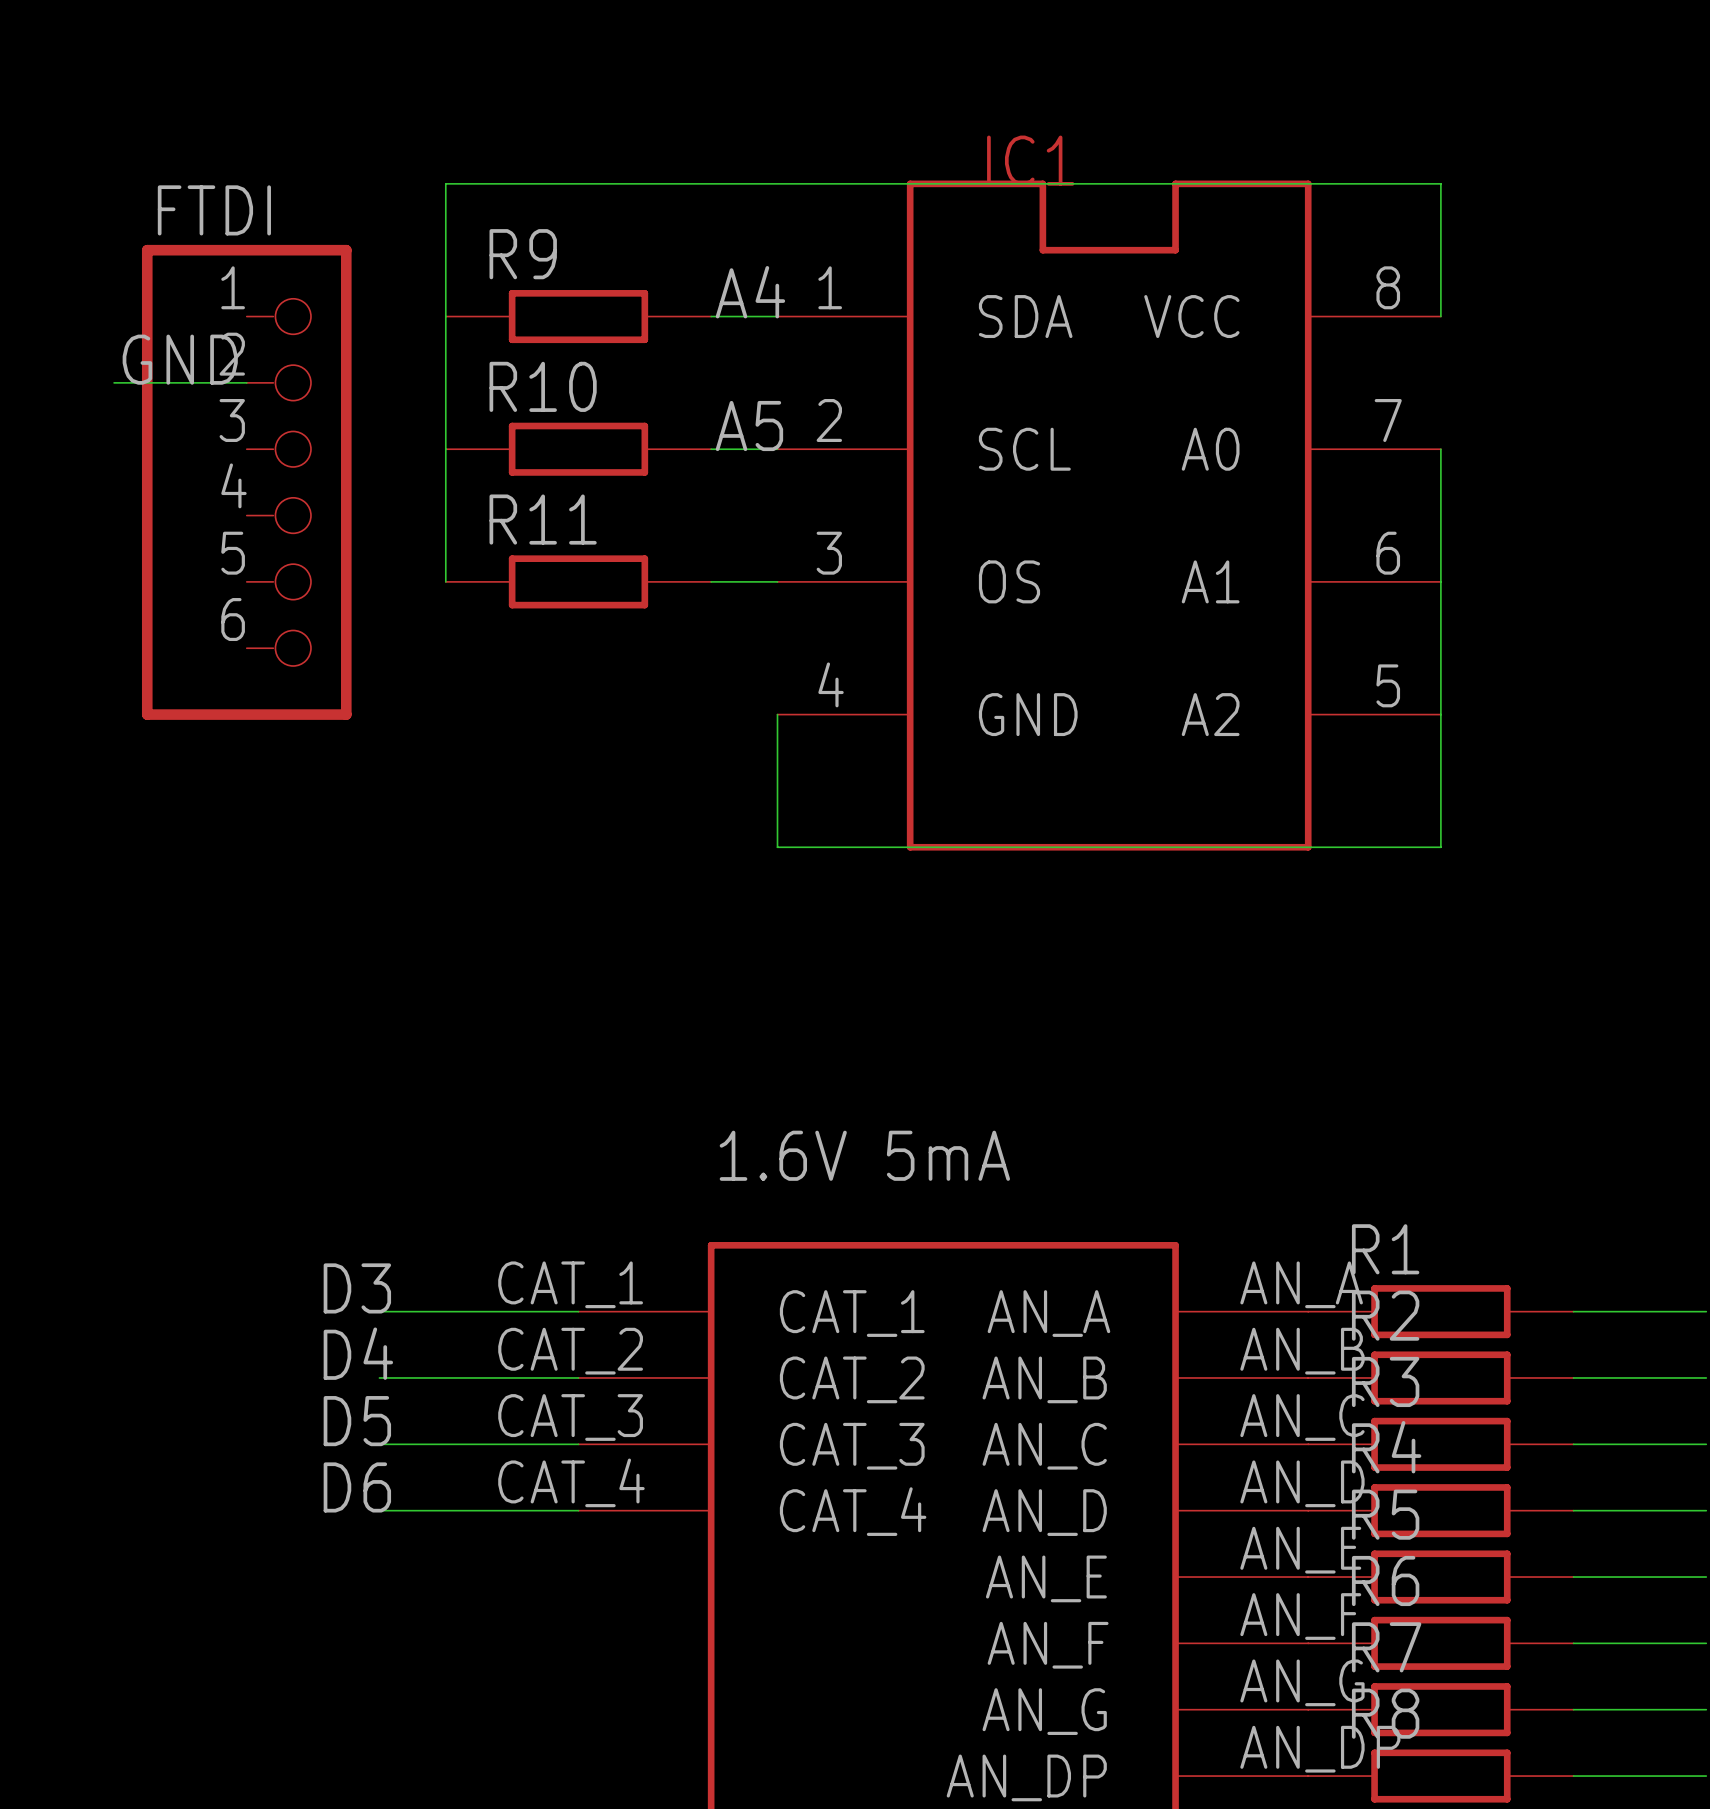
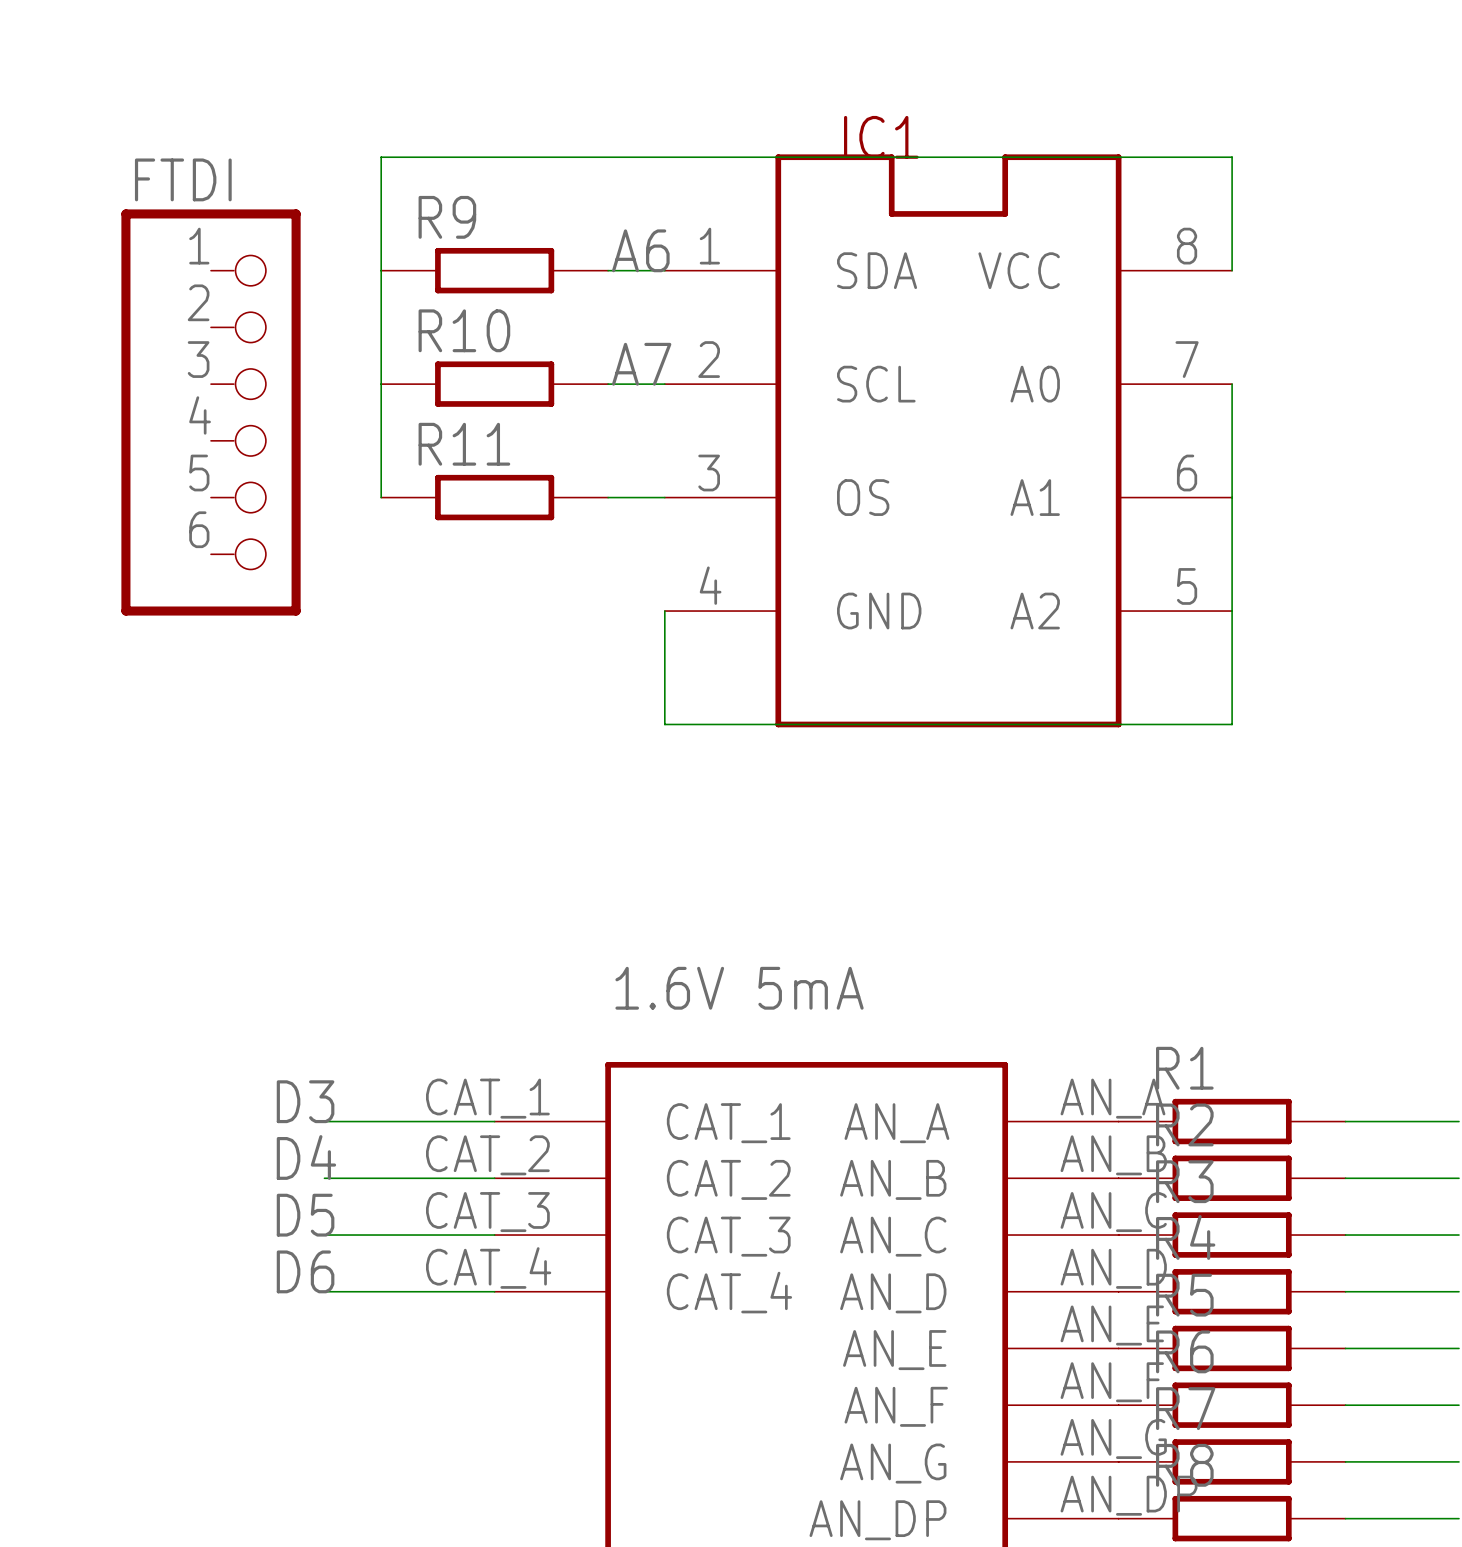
label: A4 (750, 292) -> A6 (640, 250)
label: GND (180, 359) -> none
wire: (114, 382) (246, 382) -> none
label: A5 (749, 426) -> A7 (641, 364)

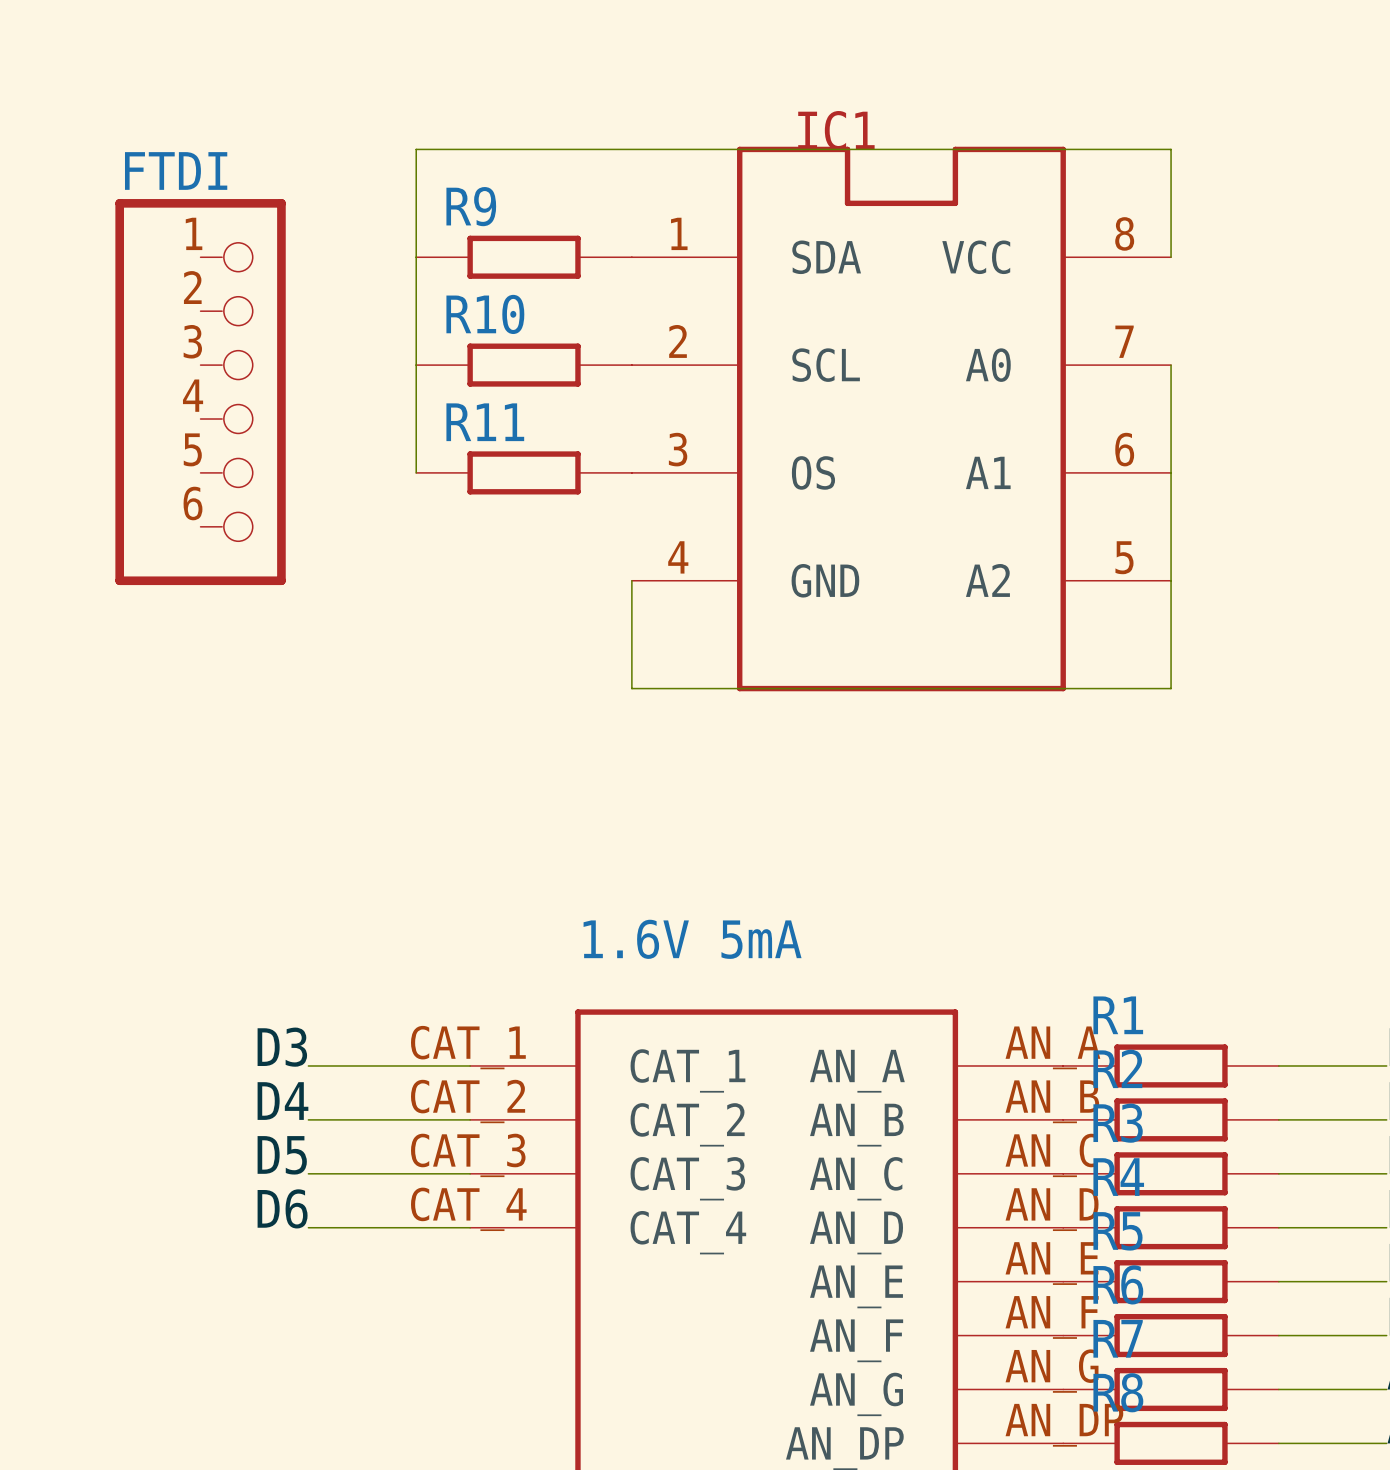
wire: (437, 157) (381, 157) (381, 497) -> (416, 149) (416, 472)
label: A6 (640, 250) -> none
R9 position: (494, 270) -> (524, 257)
label: A7 (641, 364) -> none
R10 position: (494, 384) -> (524, 365)
R11 position: (494, 497) -> (524, 472)

